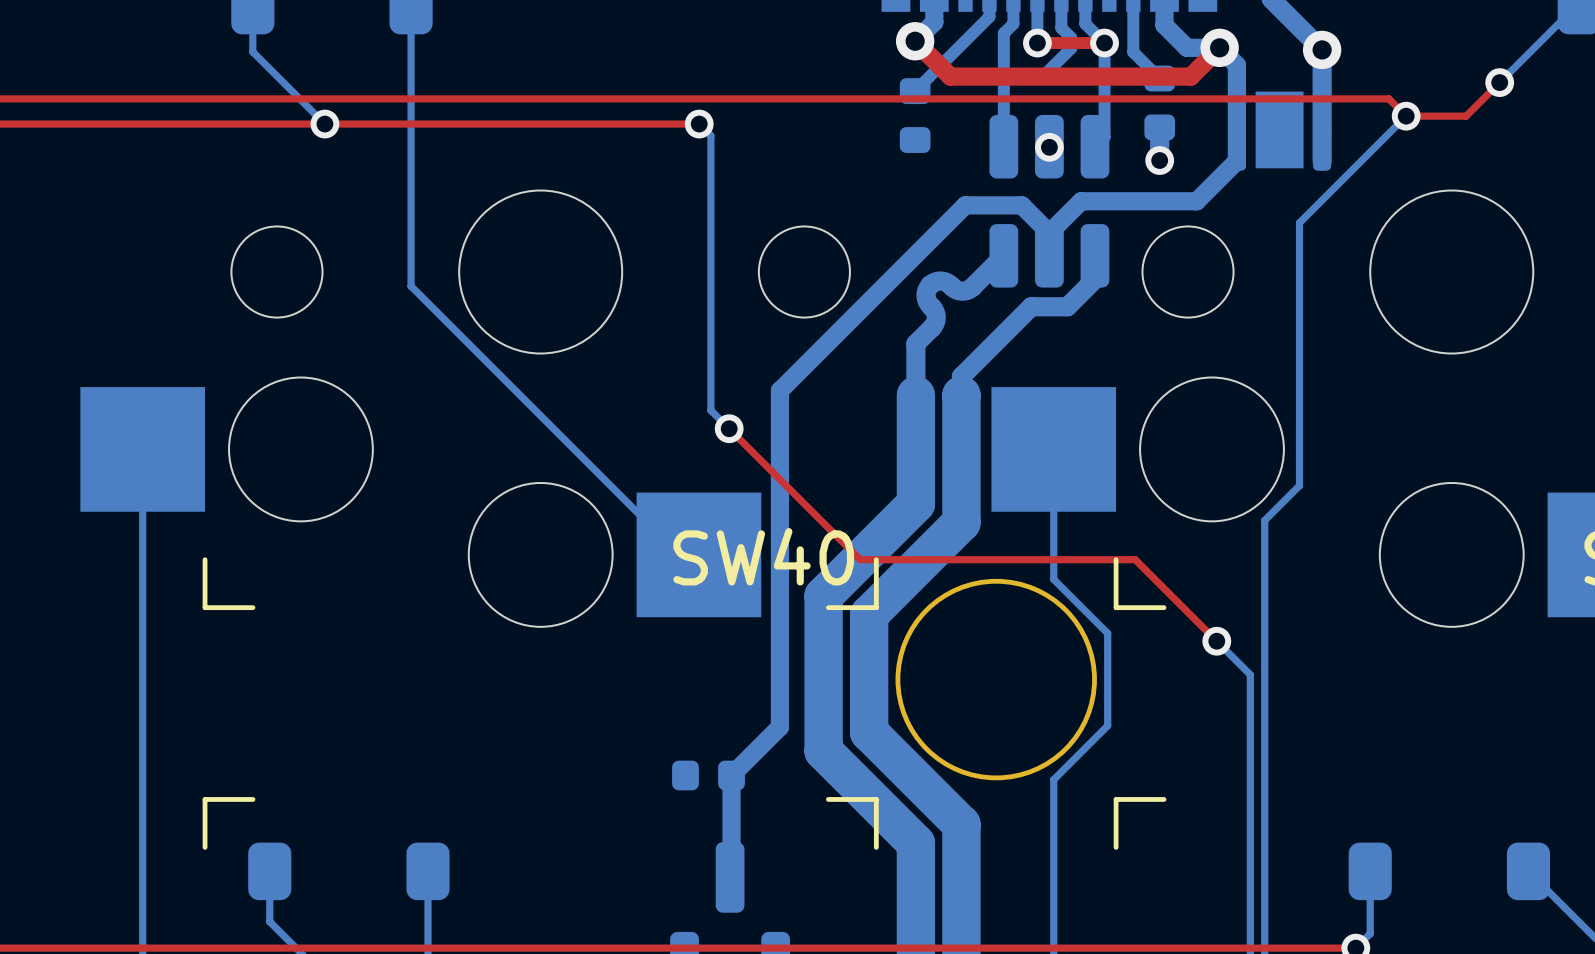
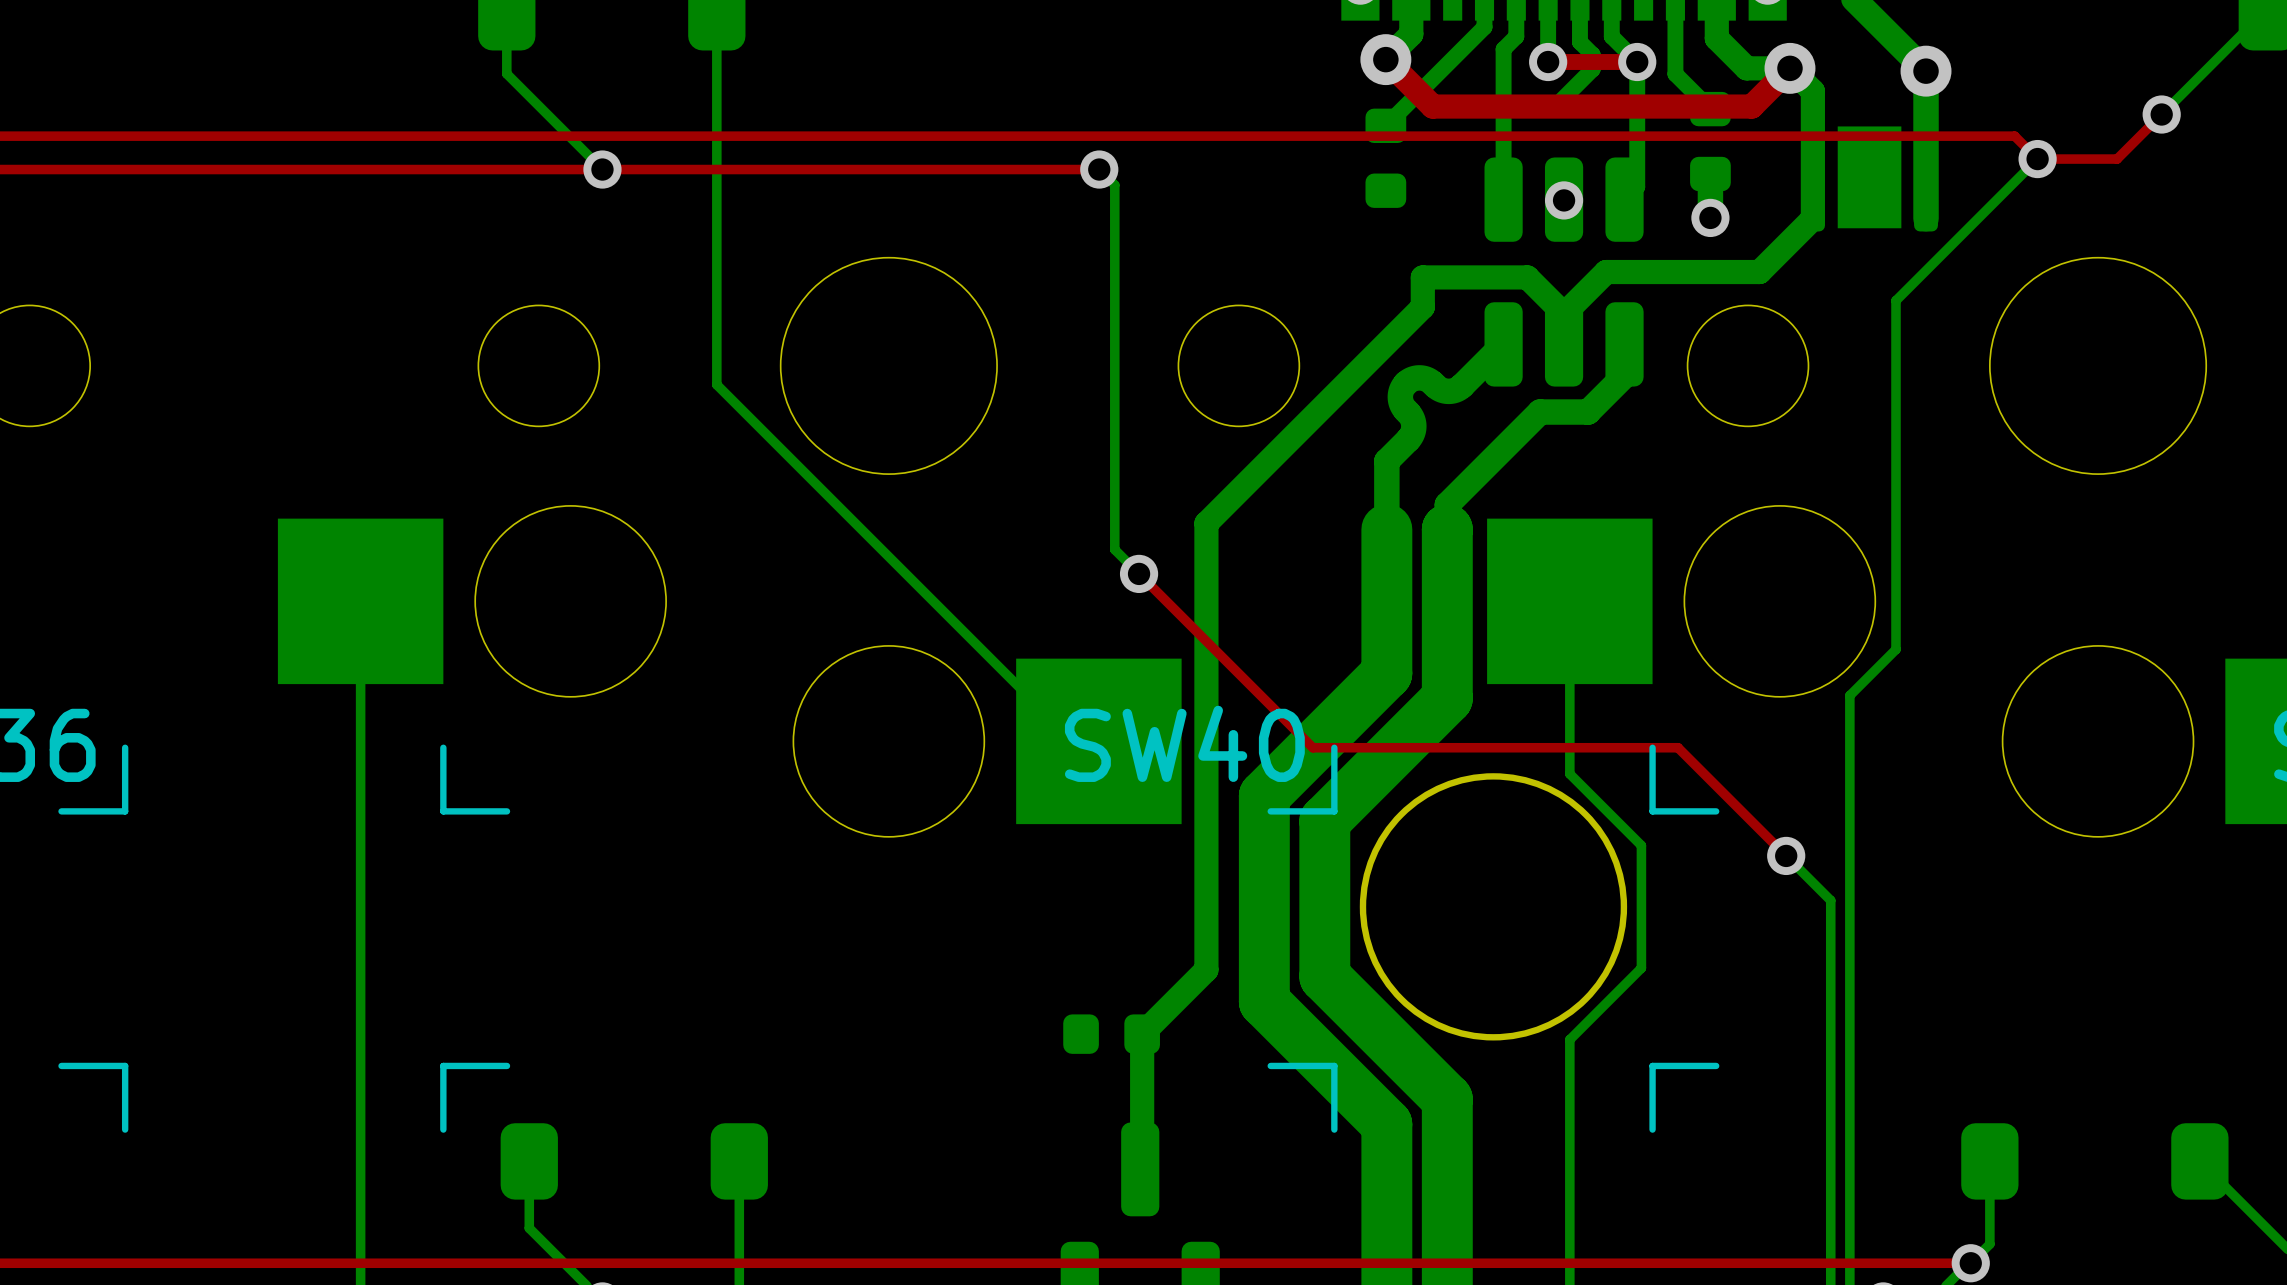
bottom track: (965, 205) (942, 227) -> (1452, 277) (1422, 277) (1422, 307)

